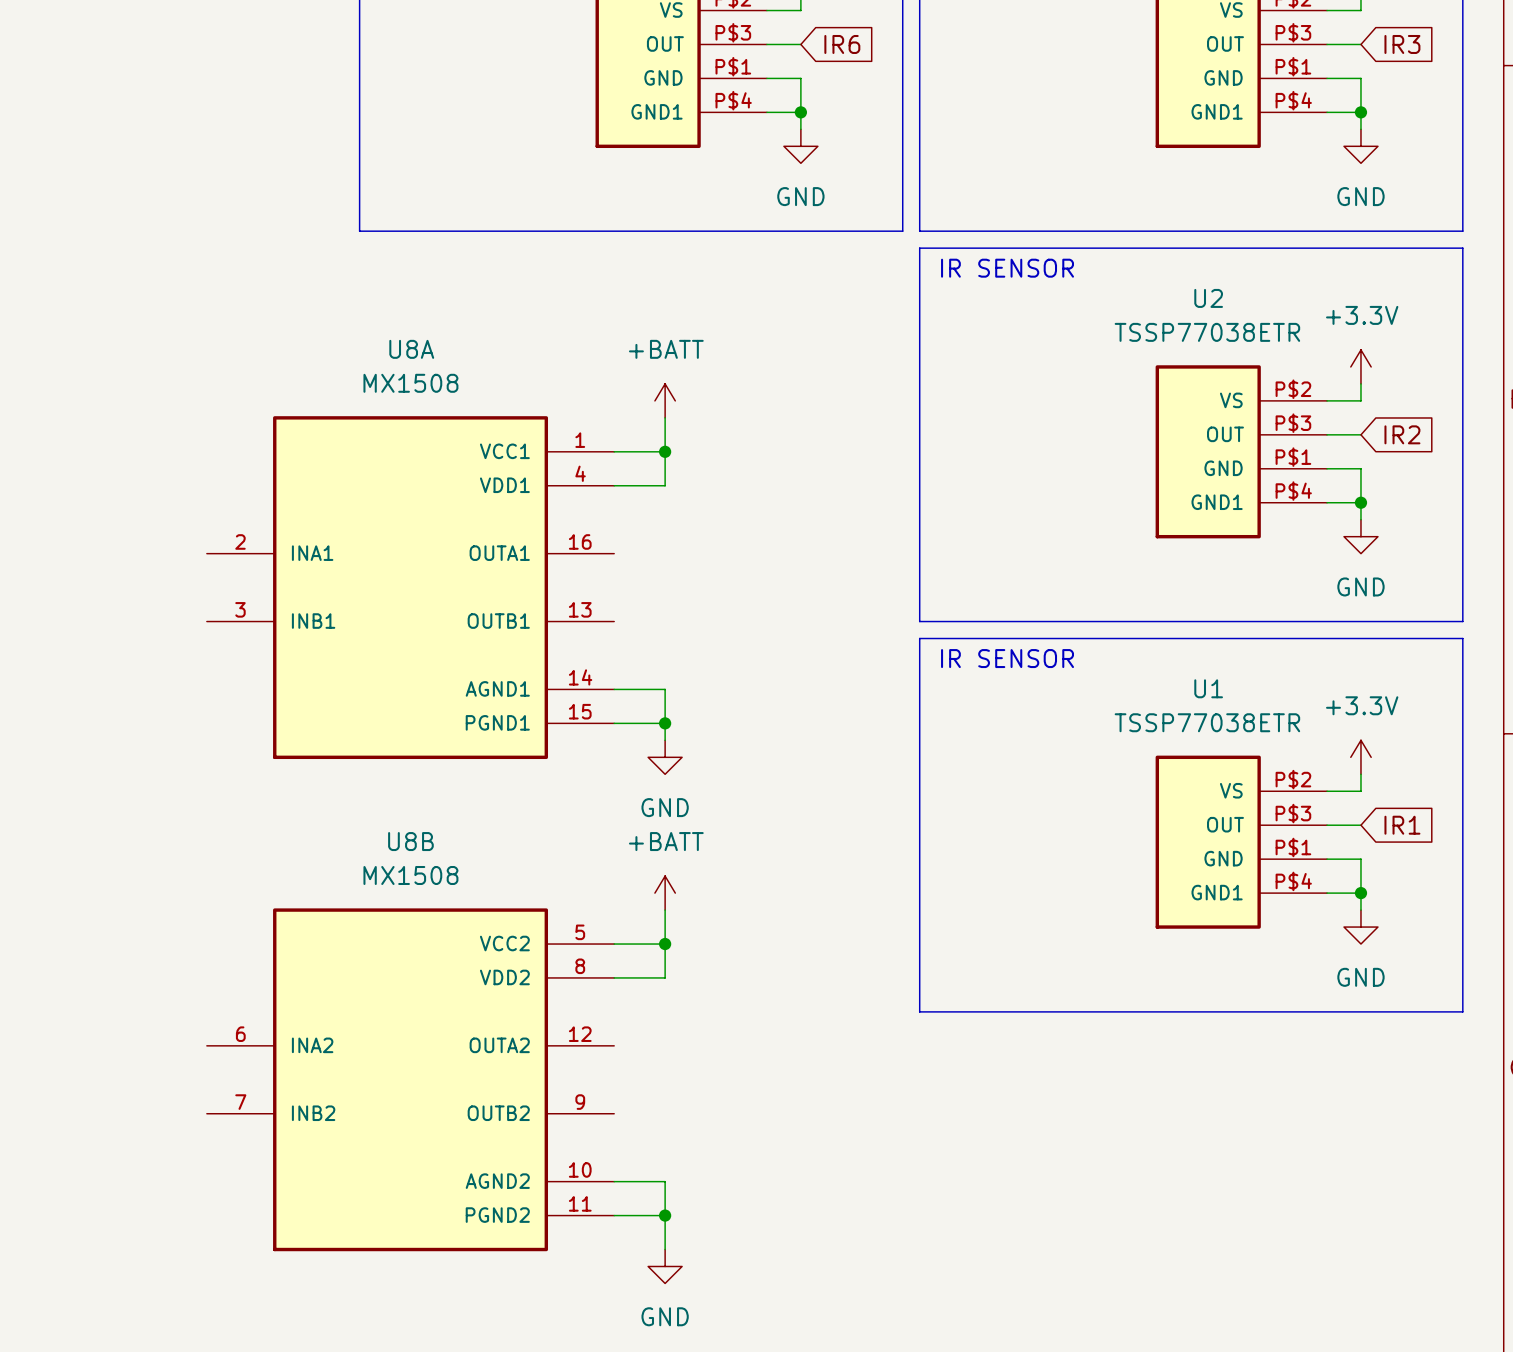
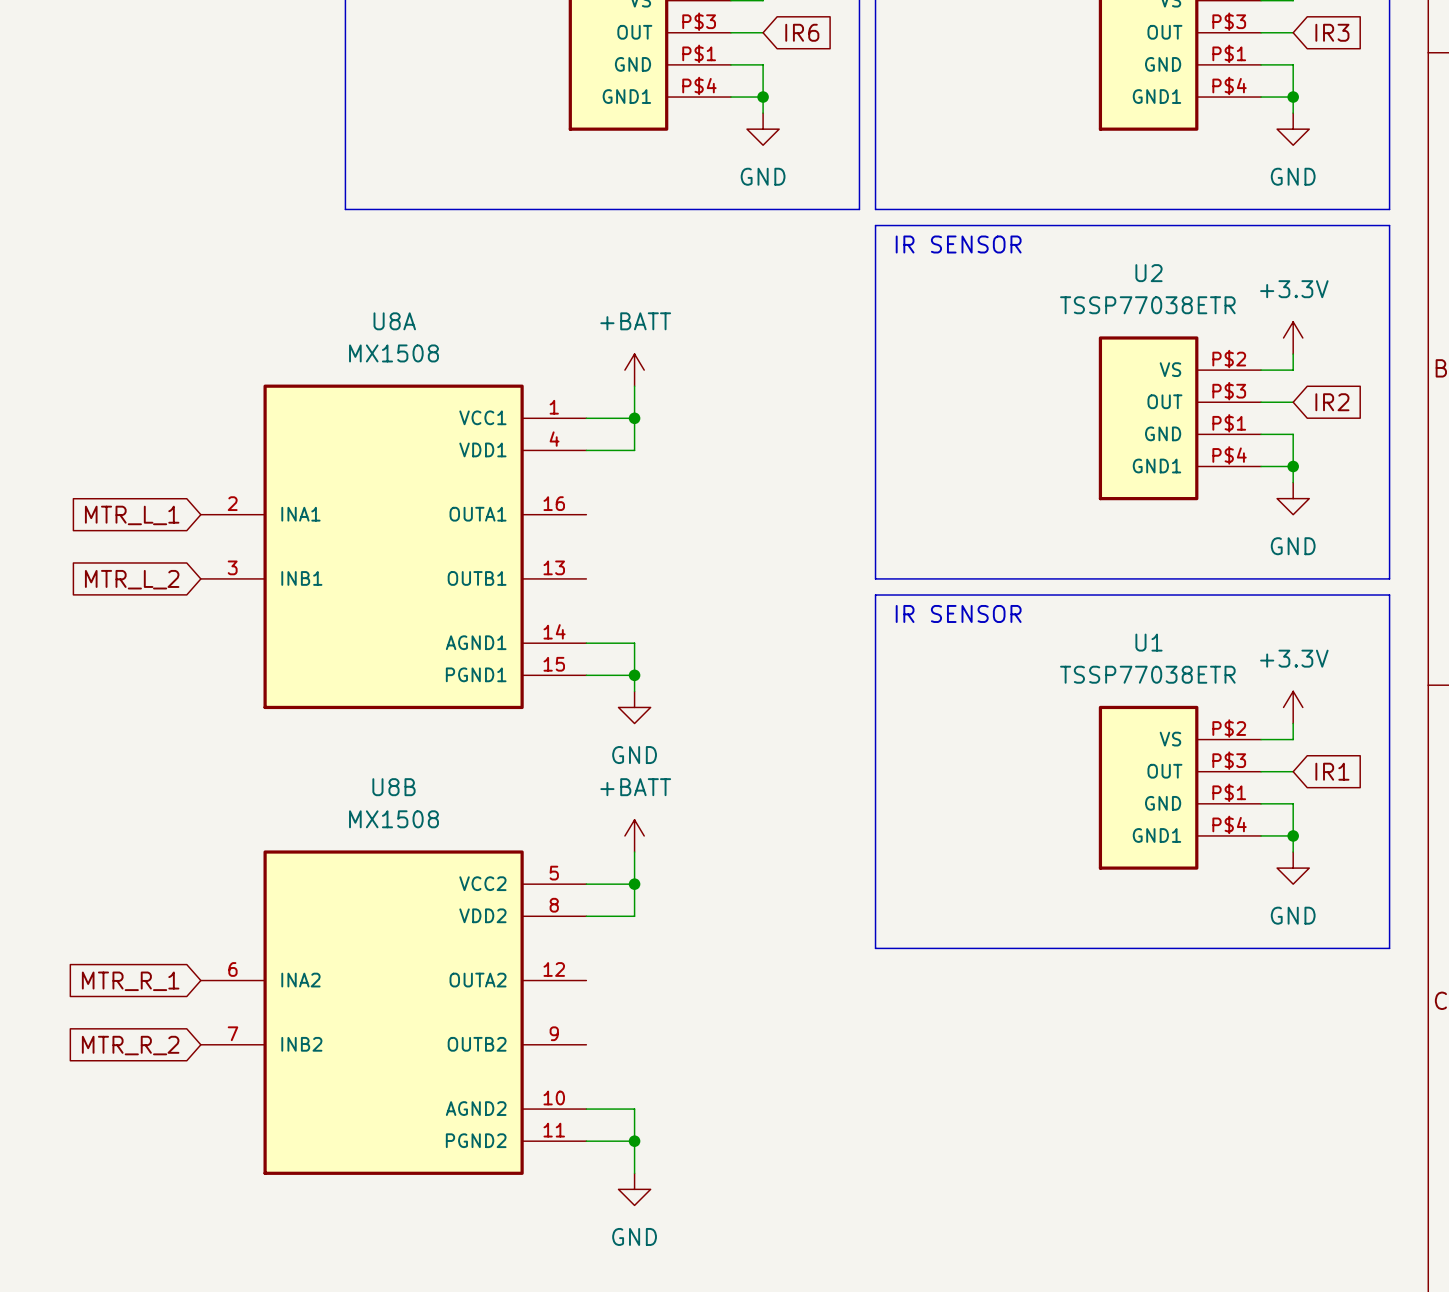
global label: none -> MTR_L_1 (132, 515)
global label: none -> MTR_L_2 (132, 579)
global label: none -> MTR_R_1 (130, 981)
global label: none -> MTR_R_2 (130, 1045)

